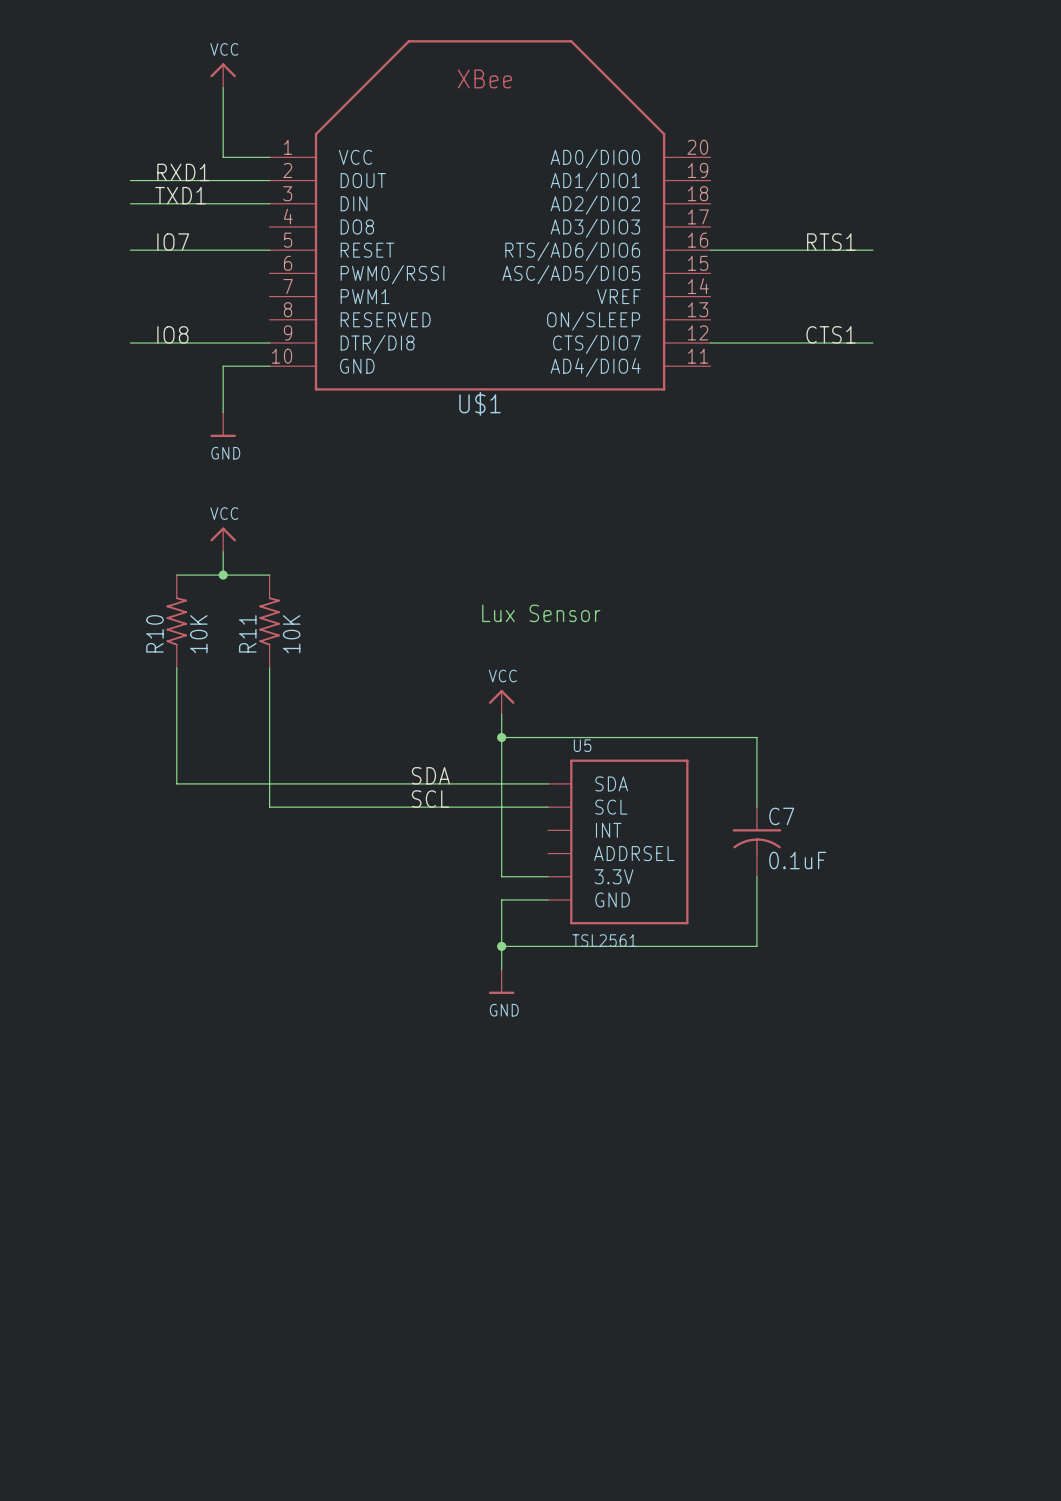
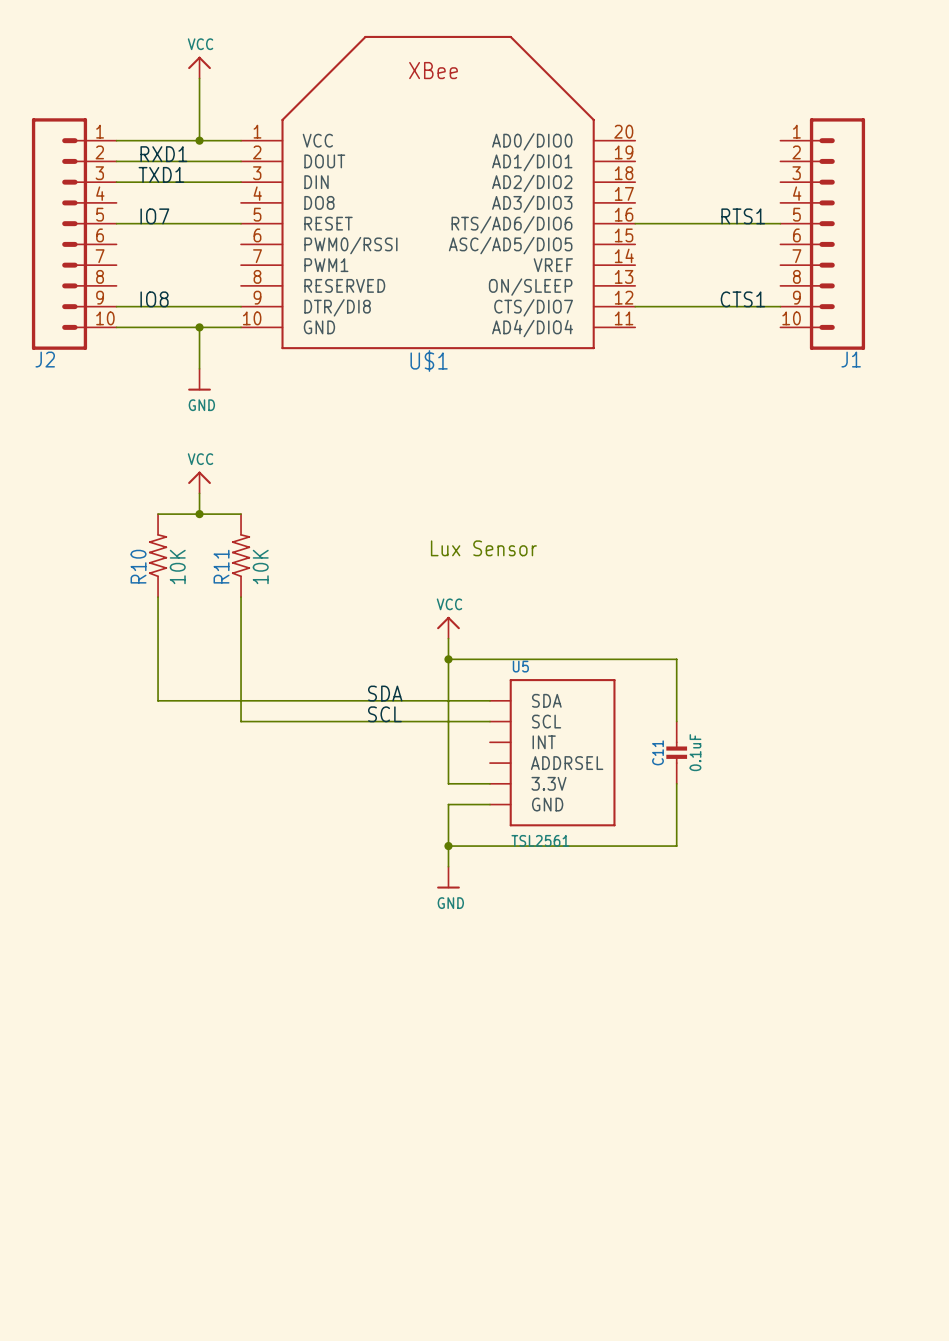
wire: none -> (116, 140) (199, 140)
junction: none -> (199, 140)
J2: none -> (74, 234)
J1: none -> (822, 234)
wire: none -> (116, 327) (199, 327)
junction: none -> (199, 327)
C7: 0.1uF (756, 841) -> none
C11: none -> 0.1uF (676, 752)

